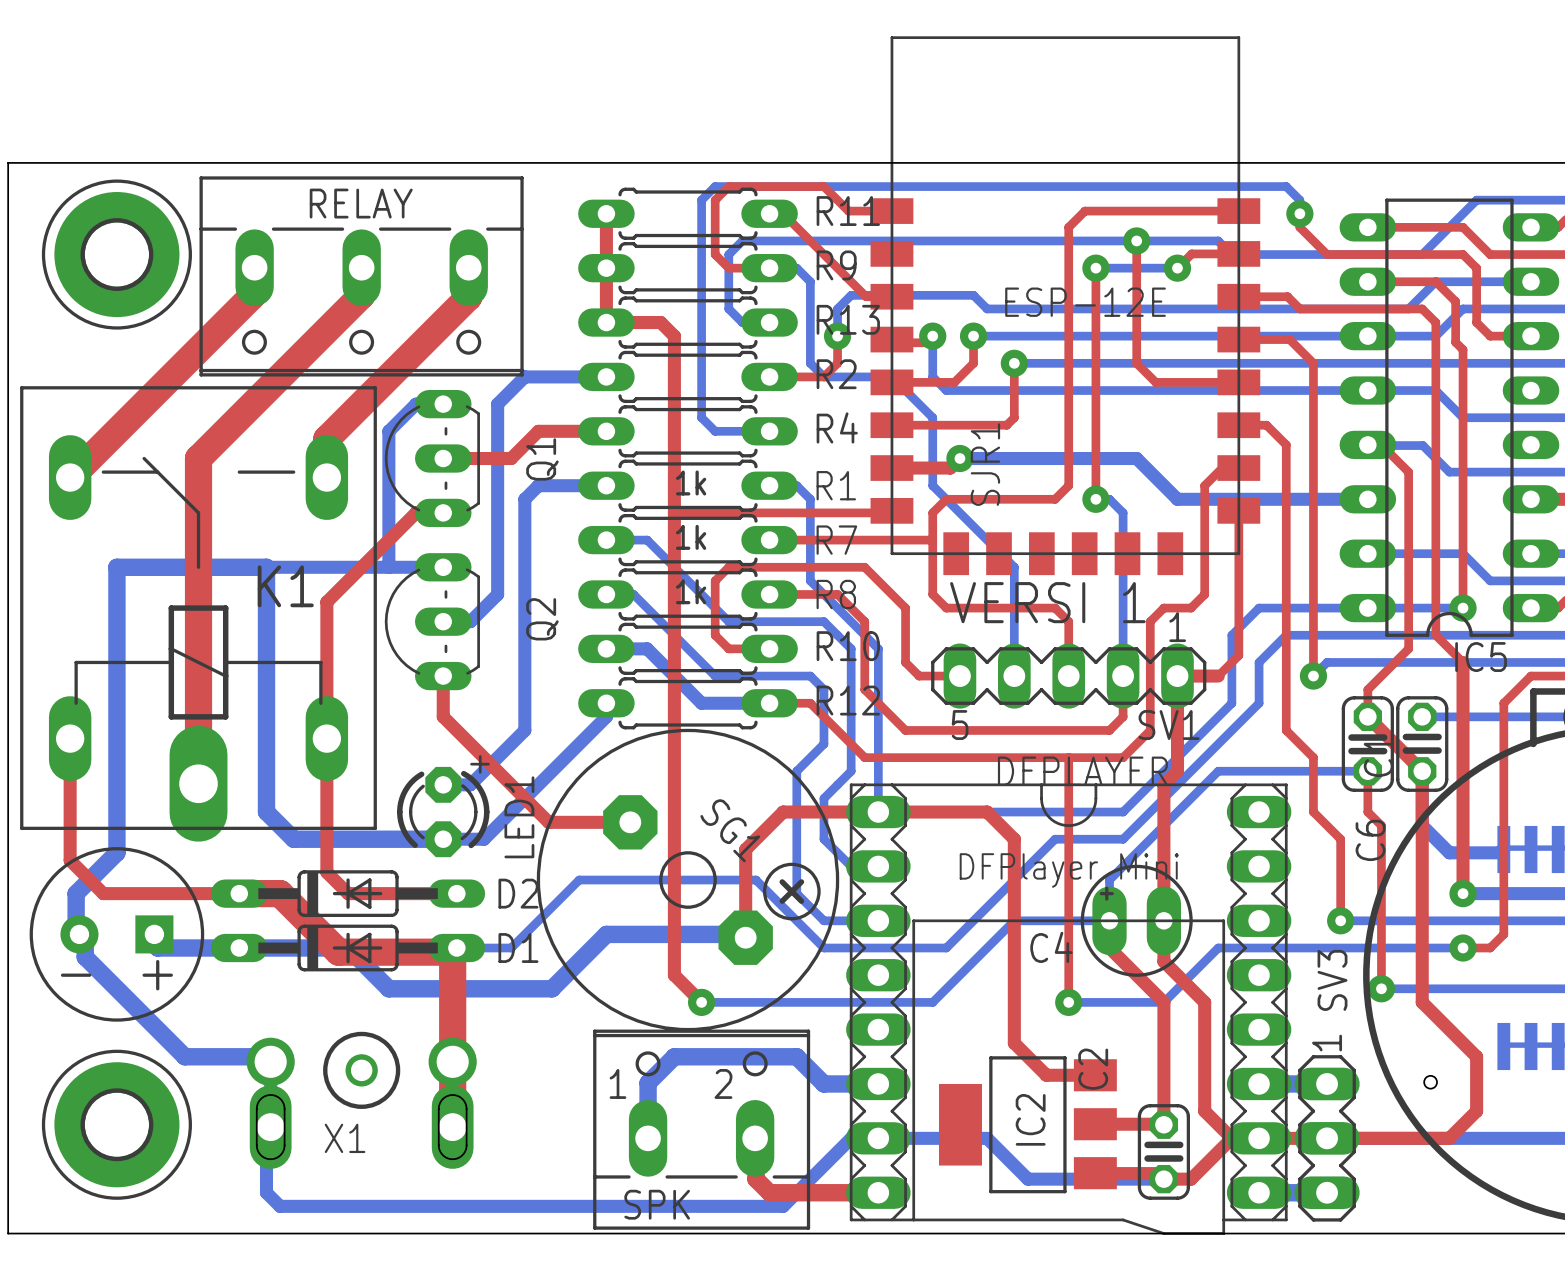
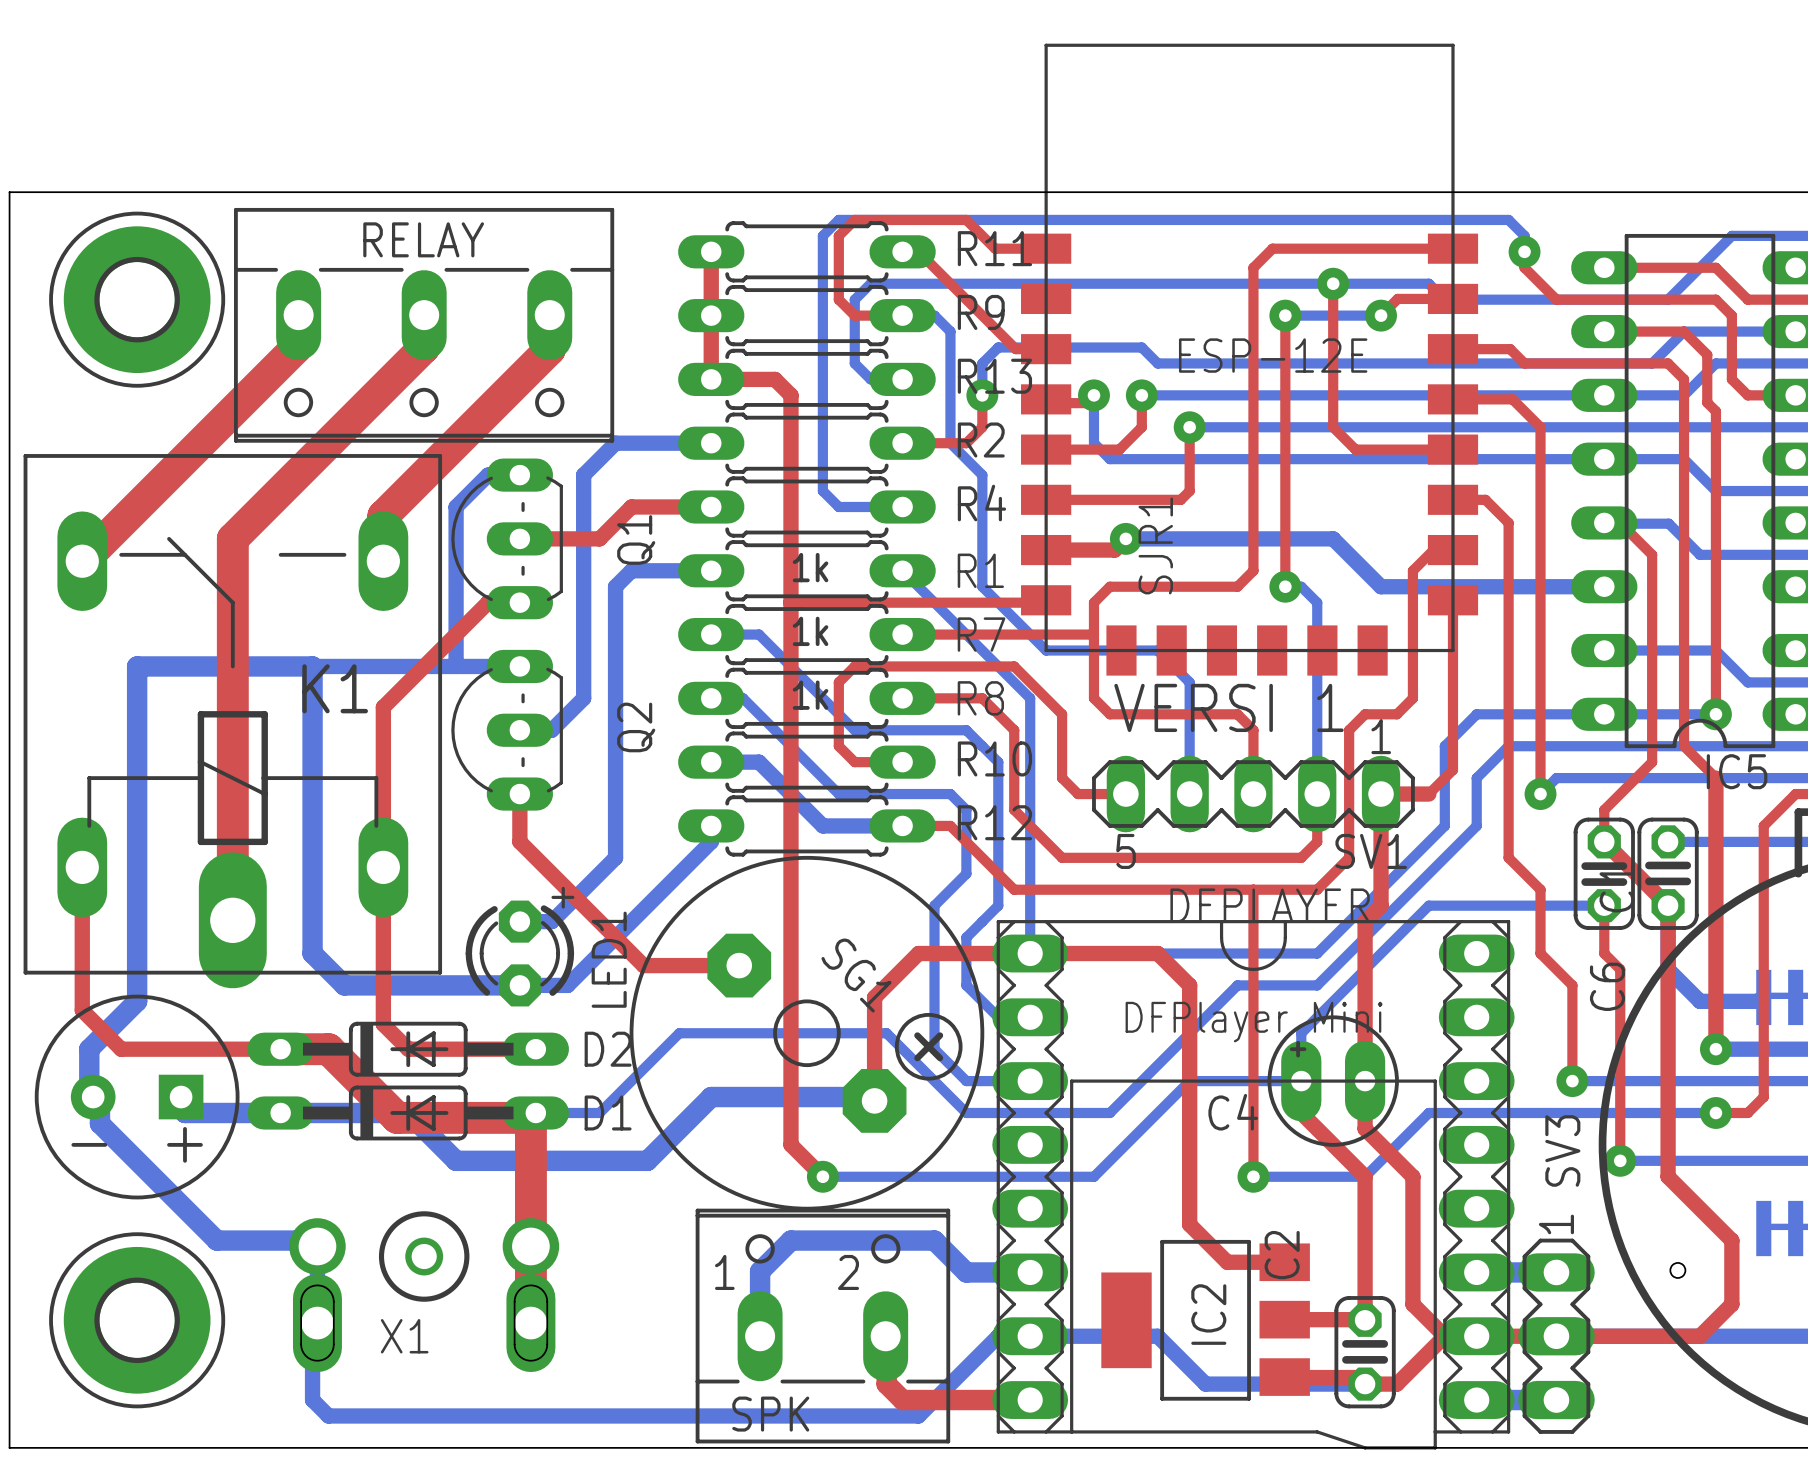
bottom track: (810, 363) (823, 376) (891, 376) (932, 417) (932, 485) (1014, 567) (1014, 580) -> (950, 427) (950, 443) (982, 475) (982, 586) (1046, 650) (1157, 650) (1189, 682)
bottom track: (769, 485) (796, 485) (810, 499) (810, 580) (878, 648) -> (902, 570) (1030, 698) (1030, 762)

